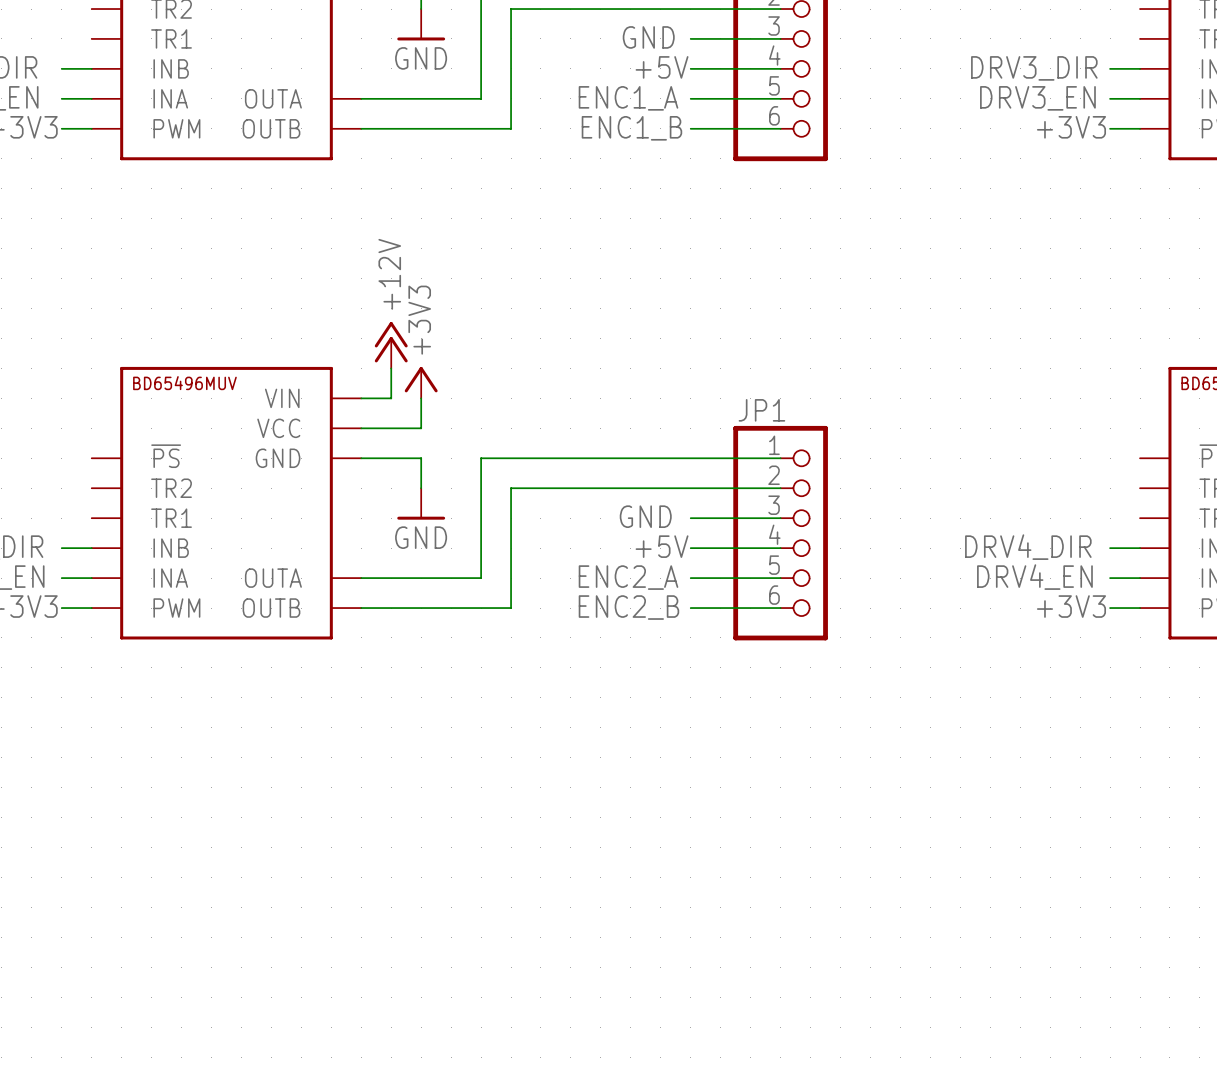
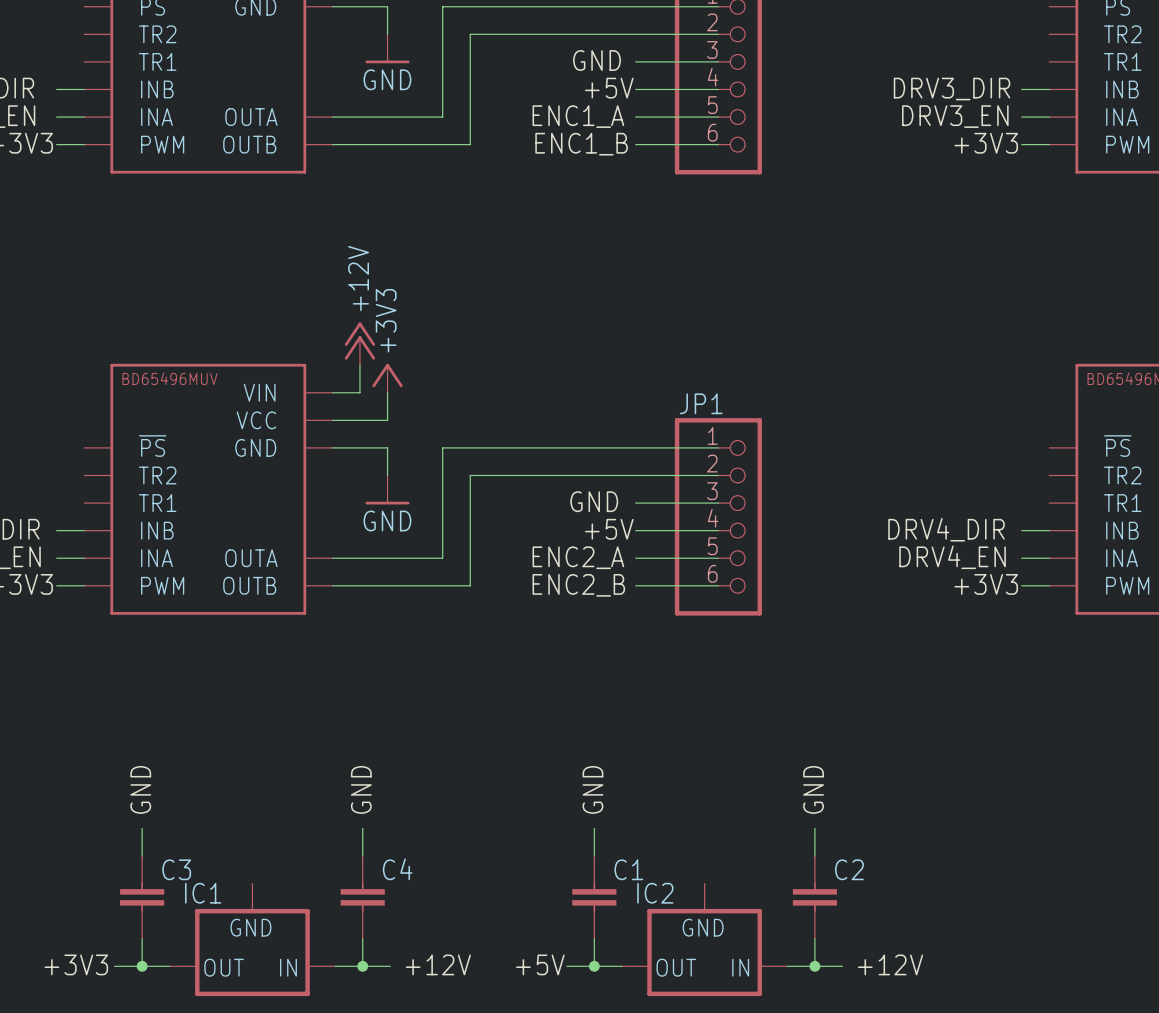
label: none -> GND (140, 789)
label: none -> GND (361, 789)
label: none -> GND (592, 789)
label: none -> GND (813, 789)
wire: none -> (142, 828) (142, 856)
wire: none -> (362, 828) (362, 856)
wire: none -> (594, 828) (594, 856)
wire: none -> (814, 828) (814, 856)
C3: none -> (142, 897)
C4: none -> (362, 897)
C1: none -> (594, 897)
C2: none -> (814, 897)
wire: none -> (142, 938) (142, 966)
wire: none -> (362, 938) (362, 966)
wire: none -> (594, 938) (594, 966)
wire: none -> (814, 938) (814, 966)
IC1: none -> (252, 939)
IC2: none -> (704, 939)
label: none -> +3V3 (76, 964)
label: none -> +12V (438, 964)
label: none -> +5V (540, 964)
label: none -> +12V (890, 964)
wire: none -> (114, 966) (169, 966)
junction: none -> (142, 966)
wire: none -> (335, 966) (390, 966)
junction: none -> (362, 966)
wire: none -> (566, 966) (621, 966)
junction: none -> (594, 966)
wire: none -> (787, 966) (842, 966)
junction: none -> (814, 966)

